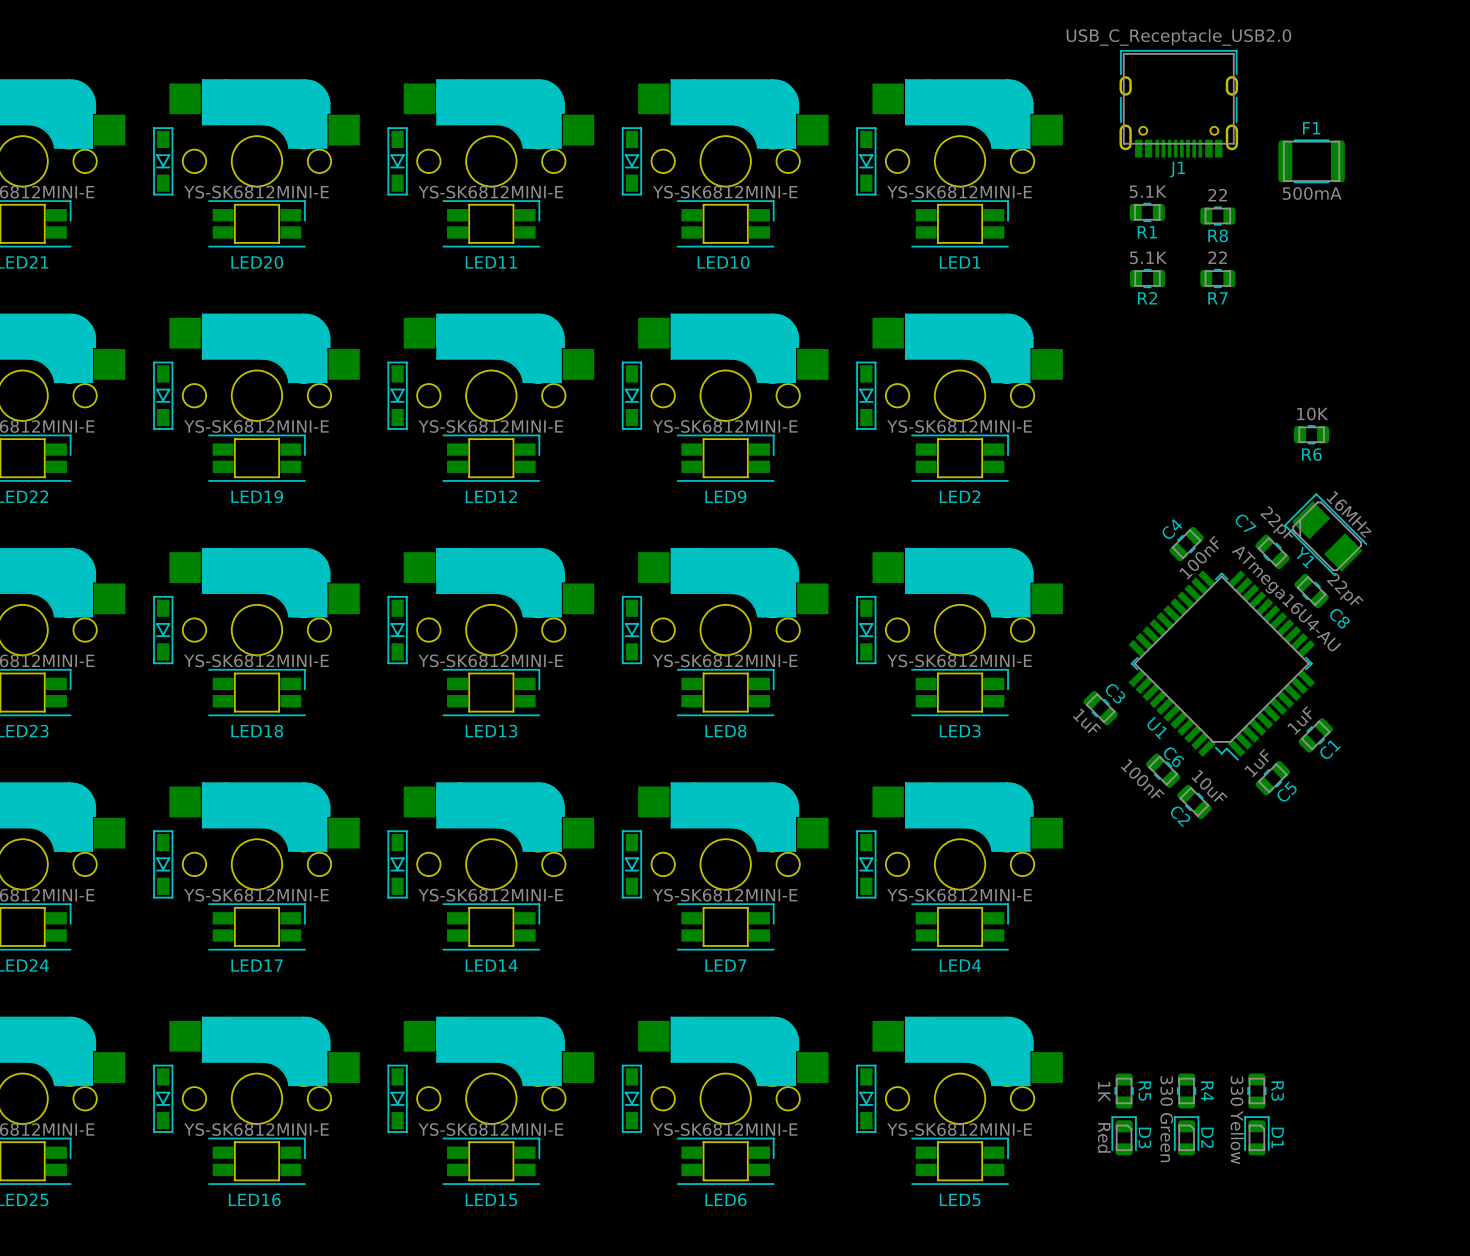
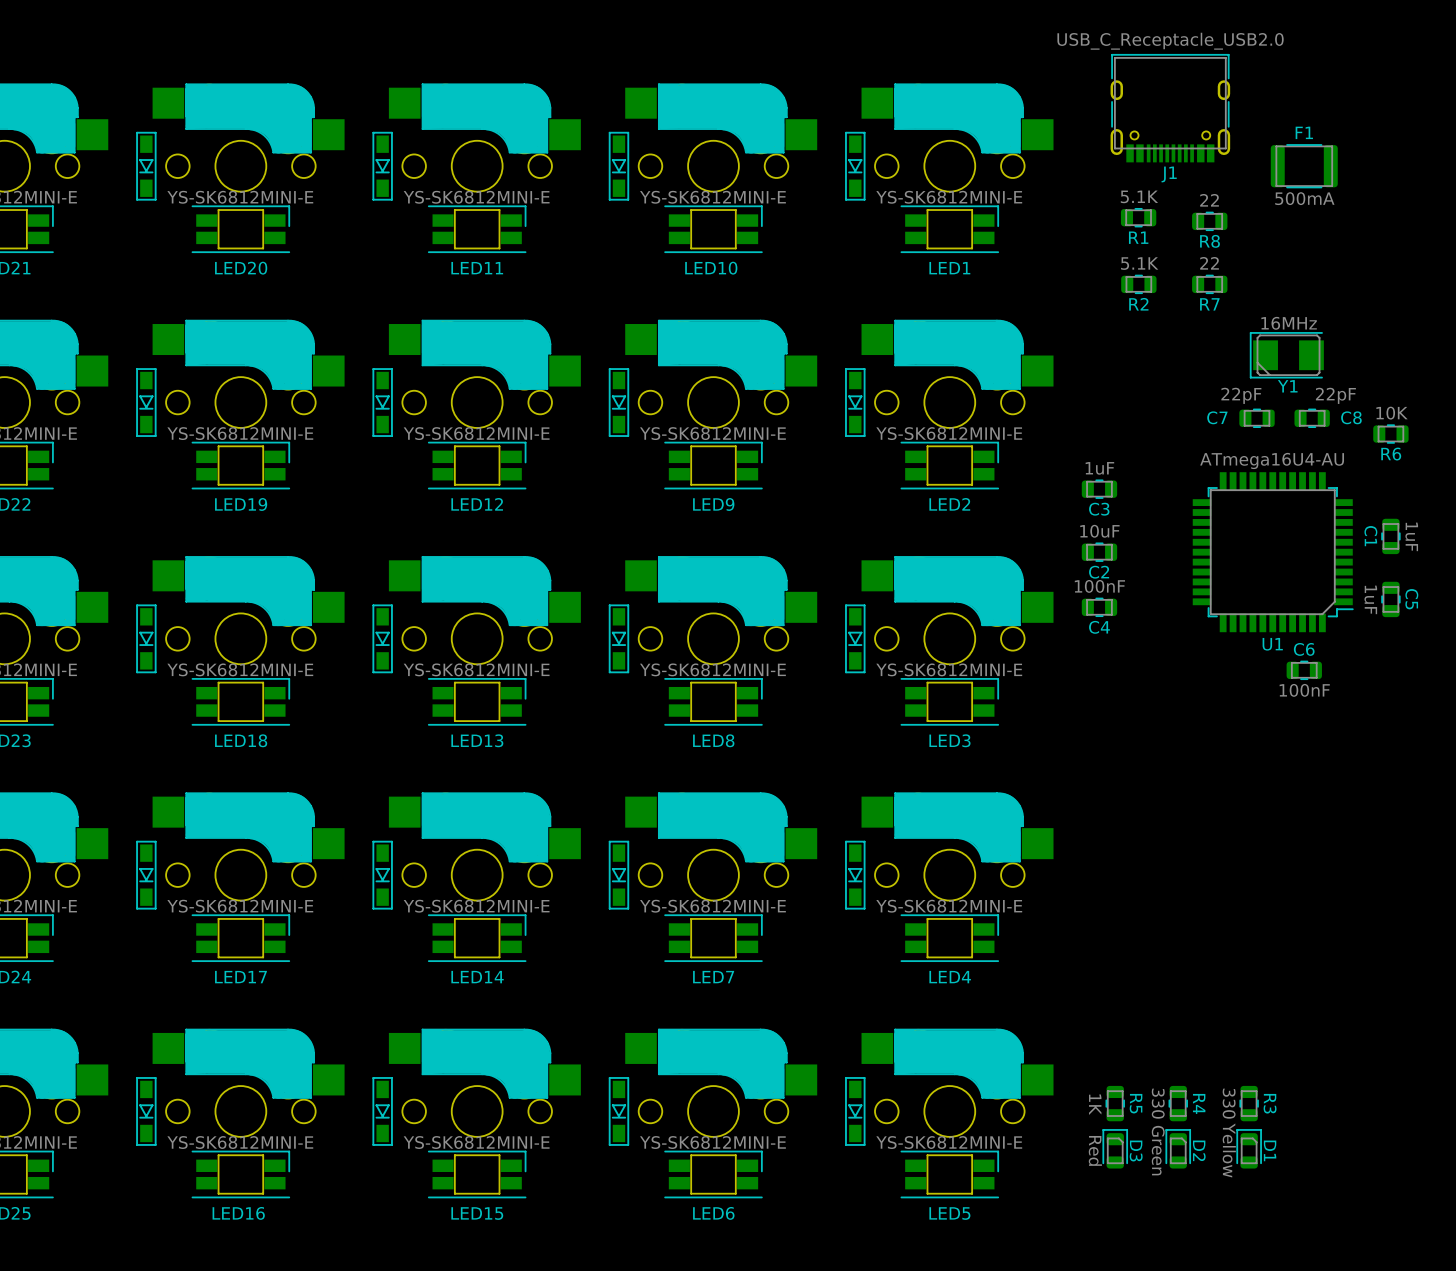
R6 position: (1311, 434) -> (1390, 434)
C4 name position: C4 (1172, 529) -> C4 (1099, 627)
Y1 rotation: 0° (1325, 534) -> 45° counterclockwise (1286, 355)
Y1 position: (1325, 534) -> (1286, 355)
C4 rotation: 0° (1186, 544) -> 45° clockwise (1099, 607)
C4 position: (1186, 544) -> (1099, 607)
C7 rotation: 0° (1272, 551) -> 45° counterclockwise (1257, 418)
C7 position: (1272, 551) -> (1257, 418)
C4 value position: 100nF (1199, 557) -> 100nF (1099, 586)
C8 rotation: 0° (1311, 590) -> 45° counterclockwise (1312, 418)
C8 position: (1311, 590) -> (1312, 418)
U1 rotation: 0° (1221, 665) -> 45° counterclockwise (1273, 552)
U1 position: (1221, 665) -> (1273, 552)
C3 name position: C3 (1115, 693) -> C3 (1099, 509)
C3 rotation: 0° (1100, 708) -> 45° counterclockwise (1099, 489)
C3 position: (1100, 708) -> (1099, 489)
C3 value position: 1uF (1087, 720) -> 1uF (1099, 468)
C1 value position: 1uF (1299, 720) -> 1uF (1411, 536)
C1 rotation: 0° (1315, 735) -> 45° counterclockwise (1390, 536)
C1 position: (1315, 735) -> (1390, 536)
C1 name position: C1 (1330, 749) -> C1 (1370, 536)
C6 rotation: 0° (1163, 770) -> 45° counterclockwise (1304, 670)
C6 position: (1163, 770) -> (1304, 670)
C5 rotation: 0° (1272, 778) -> 45° counterclockwise (1390, 599)
C5 position: (1272, 778) -> (1390, 599)
C2 rotation: 0° (1194, 801) -> 45° counterclockwise (1099, 552)
C2 position: (1194, 801) -> (1099, 552)

